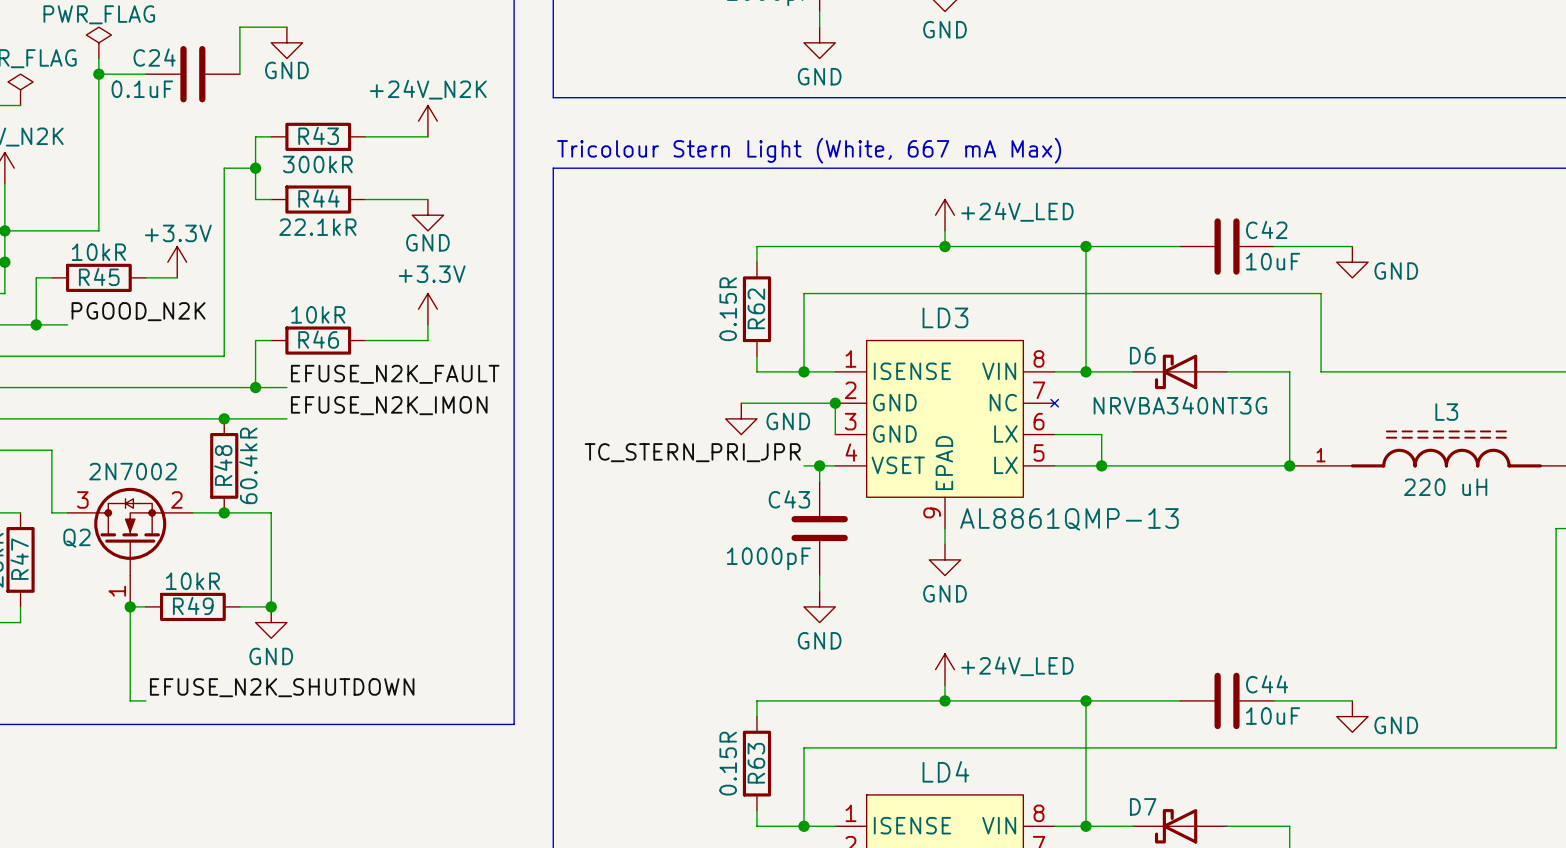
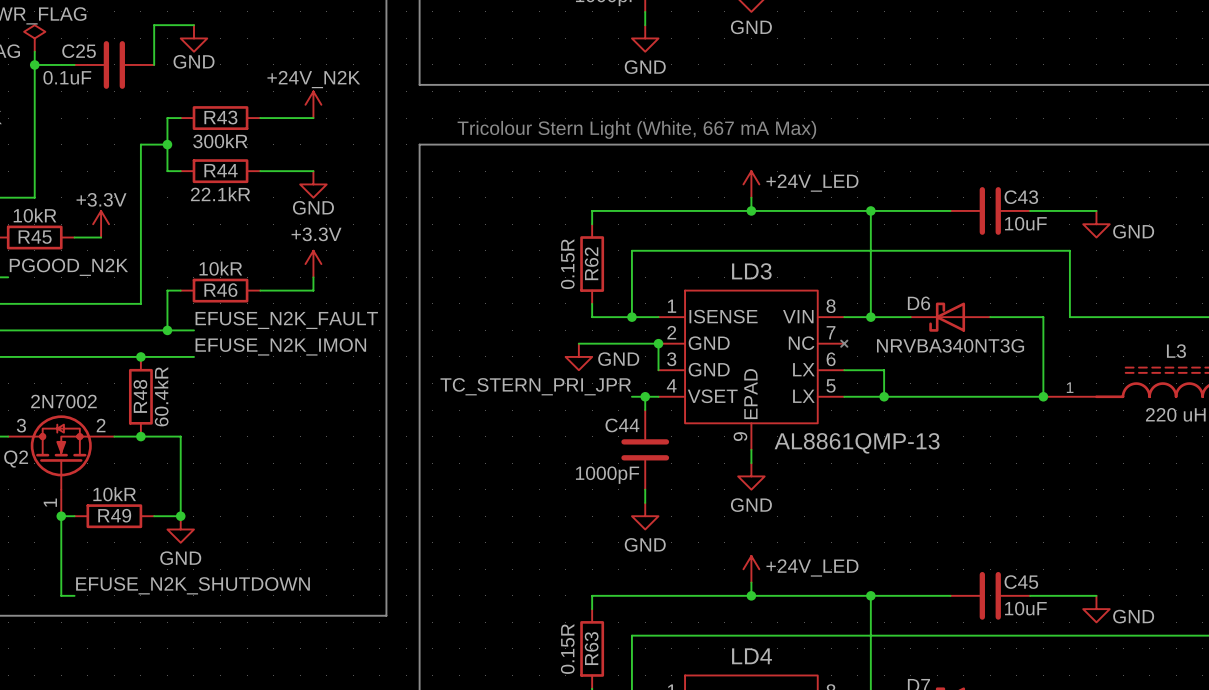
C24 name: C24 (154, 57) -> C25 (79, 51)
C42 name: C42 (1266, 229) -> C43 (1021, 197)
C43 name: C43 (789, 499) -> C44 (622, 425)
C44 name: C44 (1267, 684) -> C45 (1021, 582)

